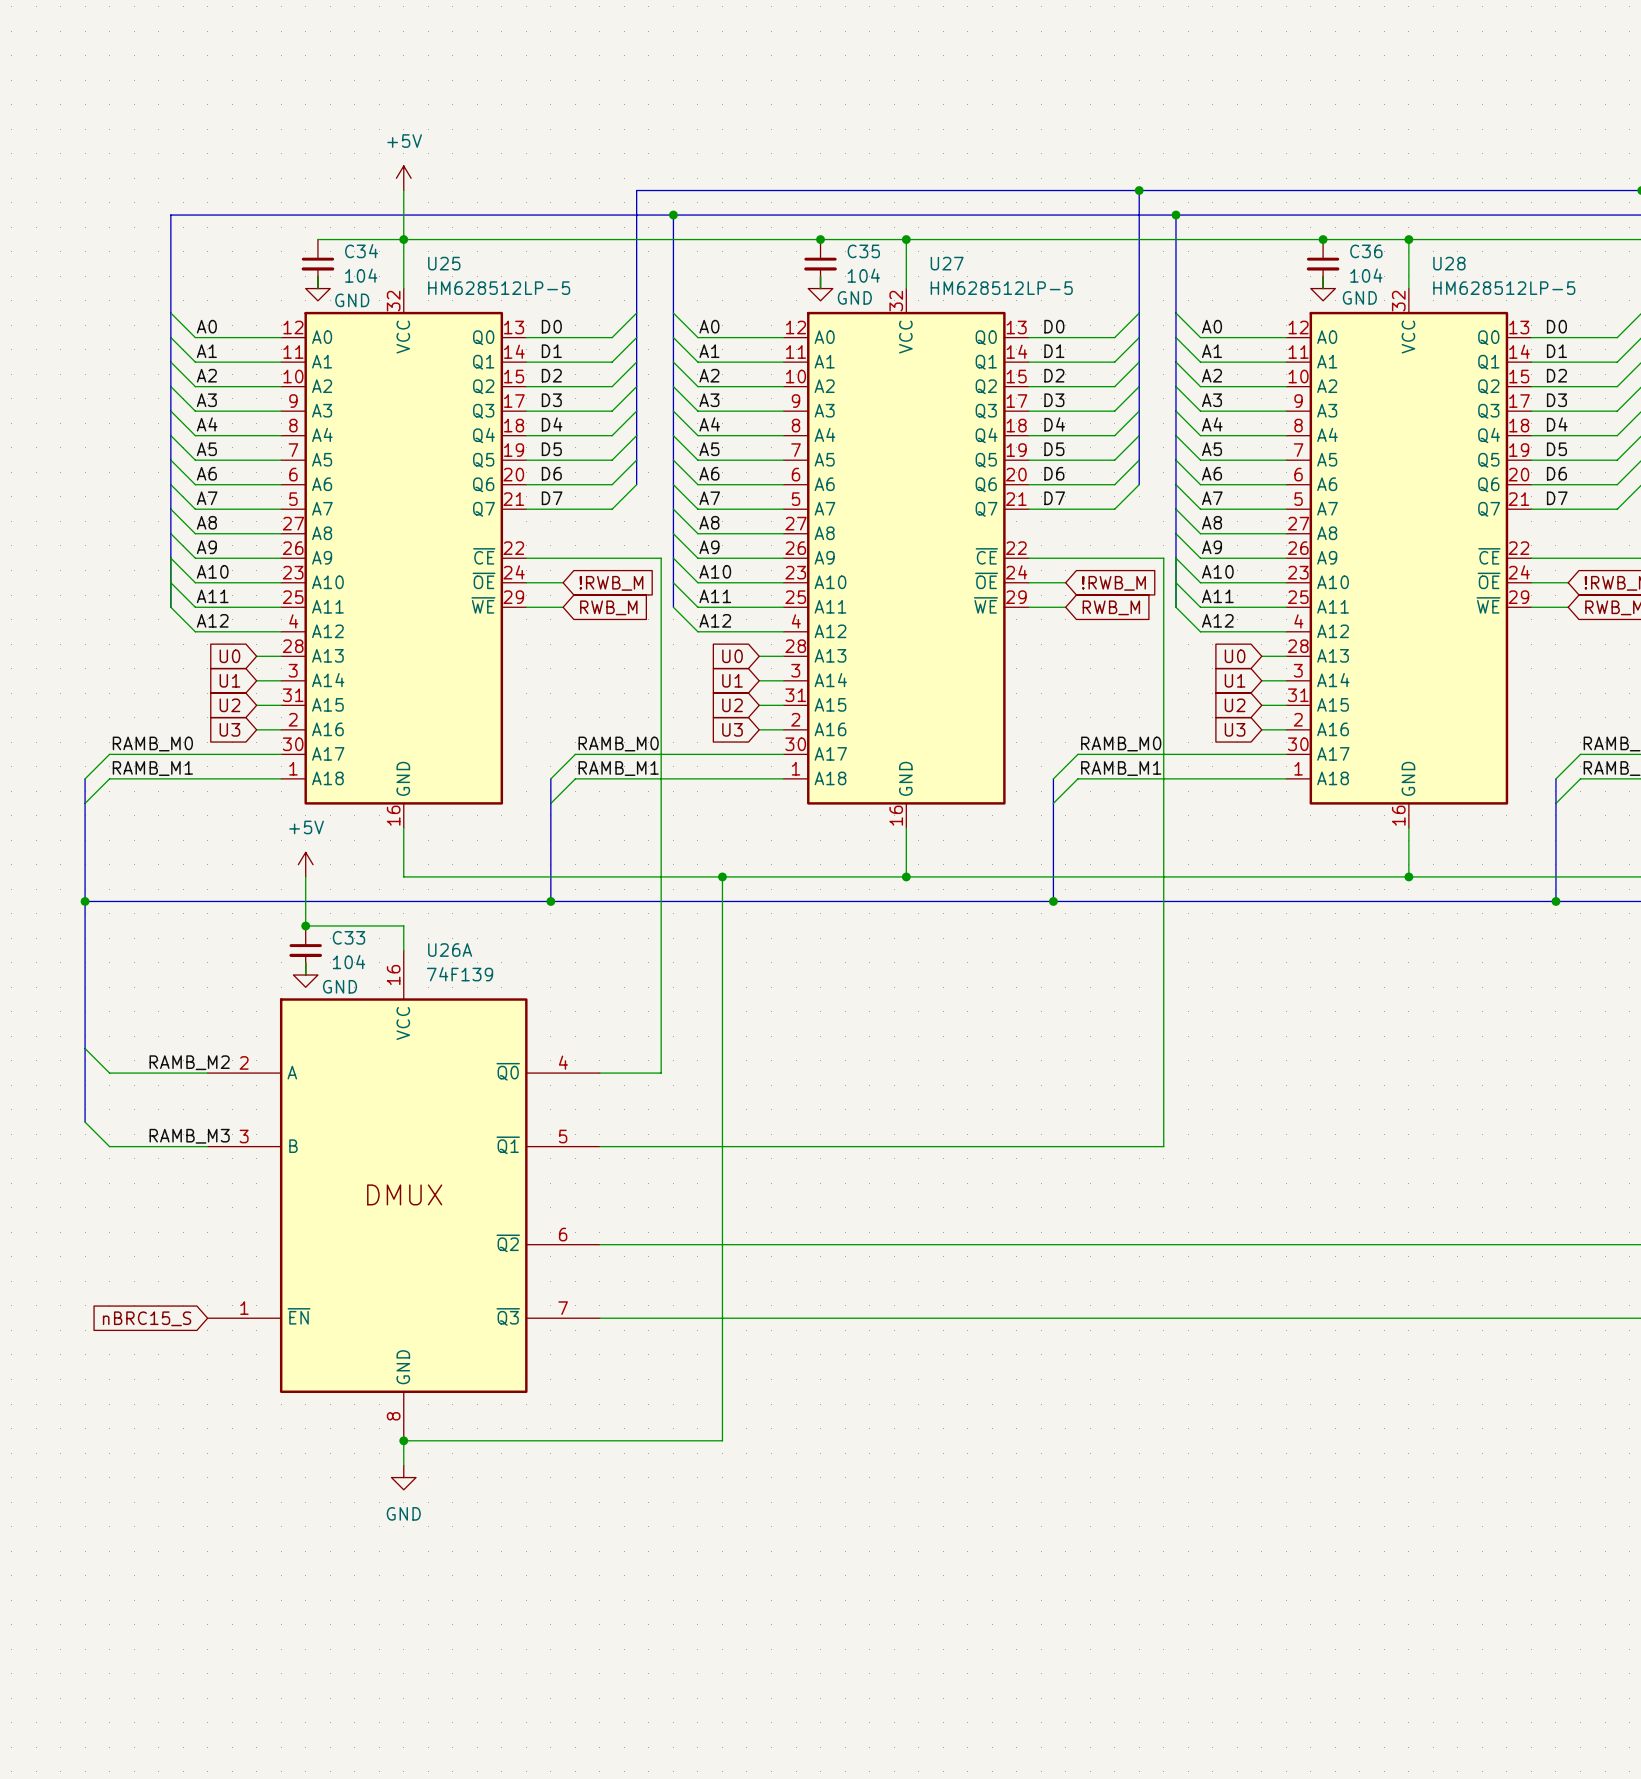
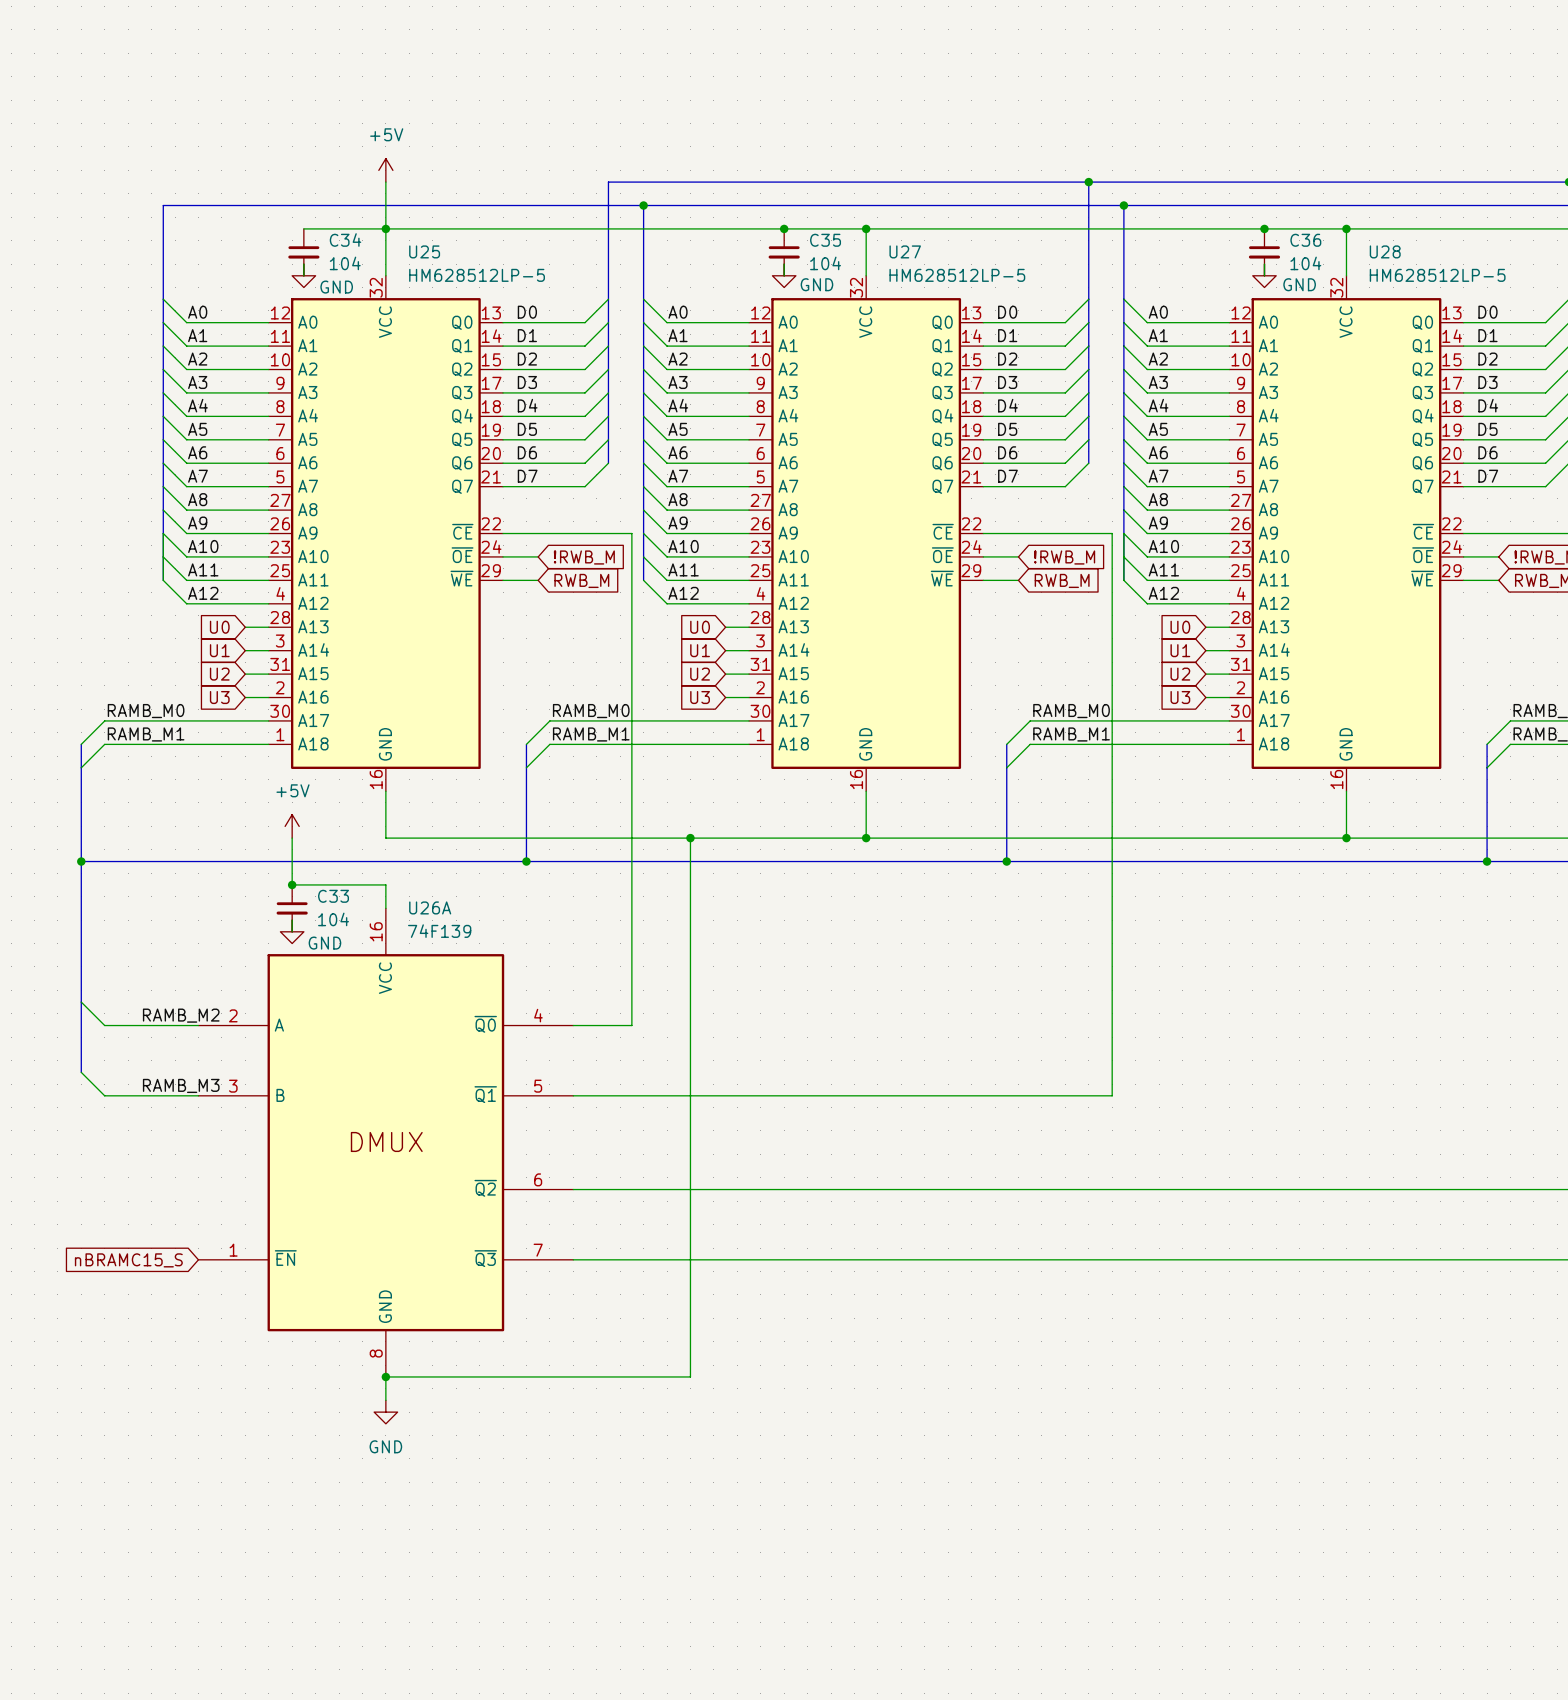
global label: nBRC15_S (147, 1318) -> nBRAMC15_S (128, 1260)

